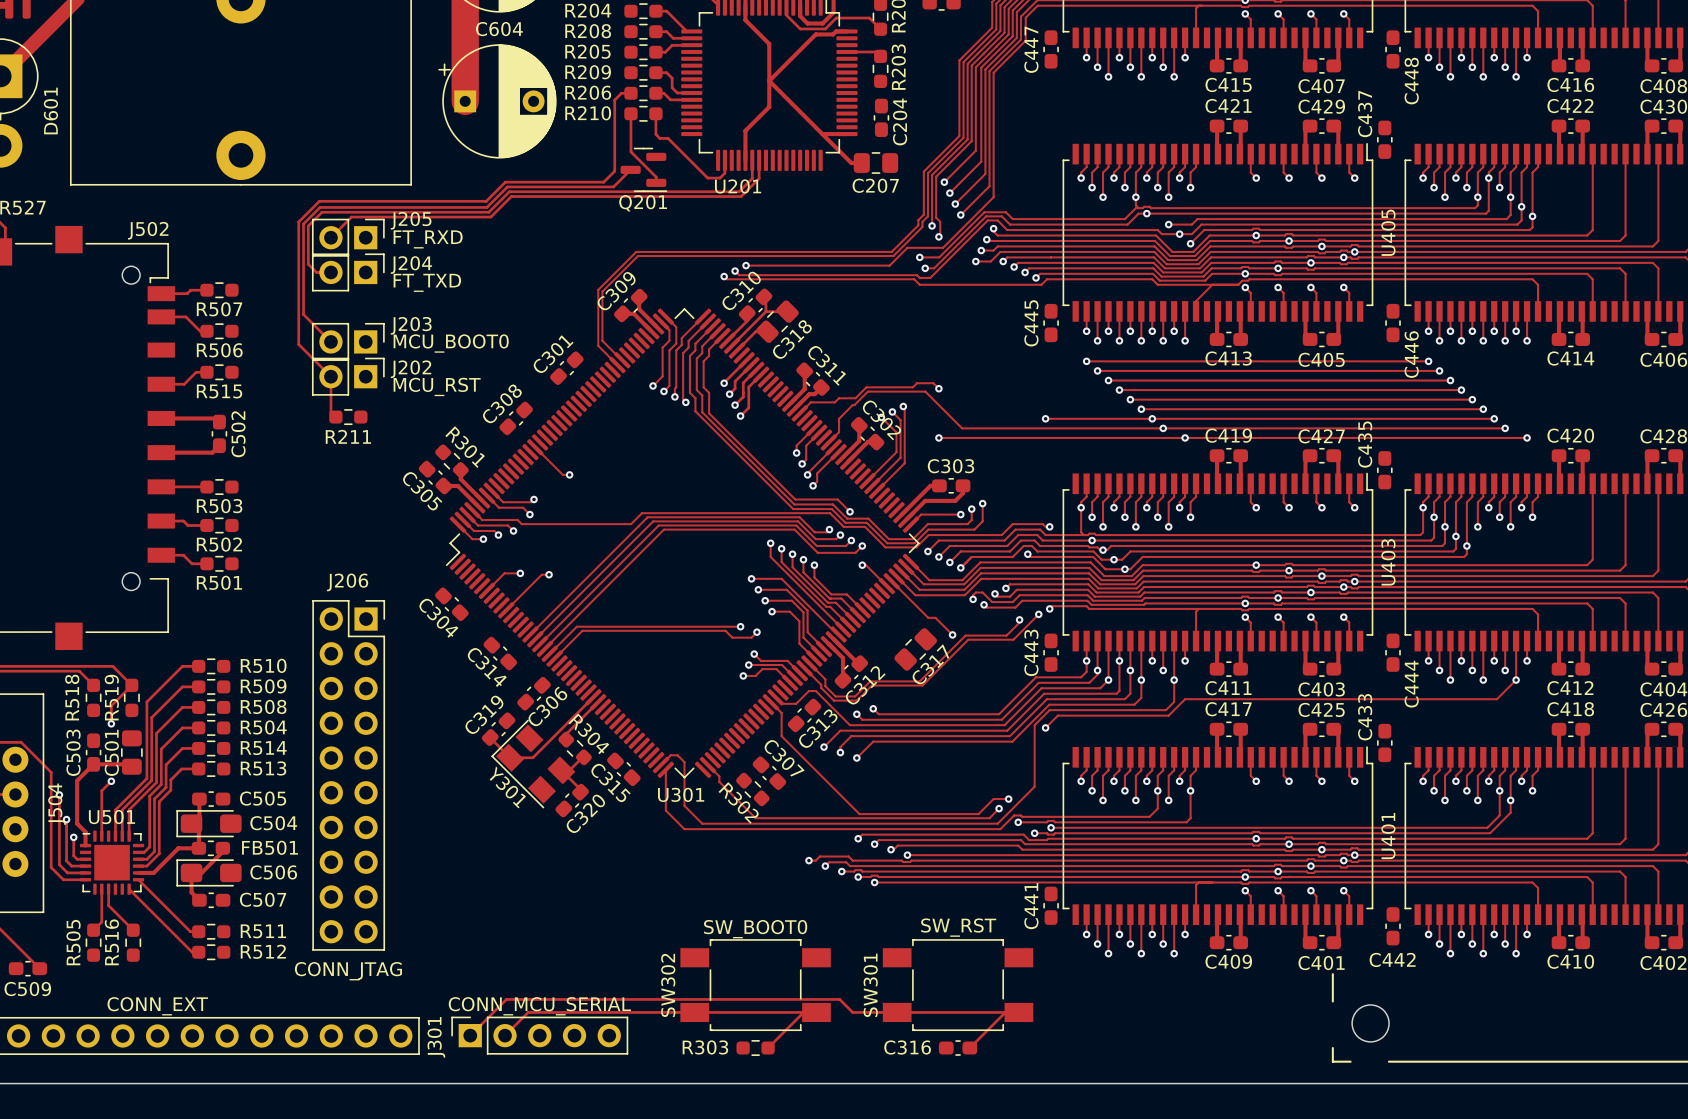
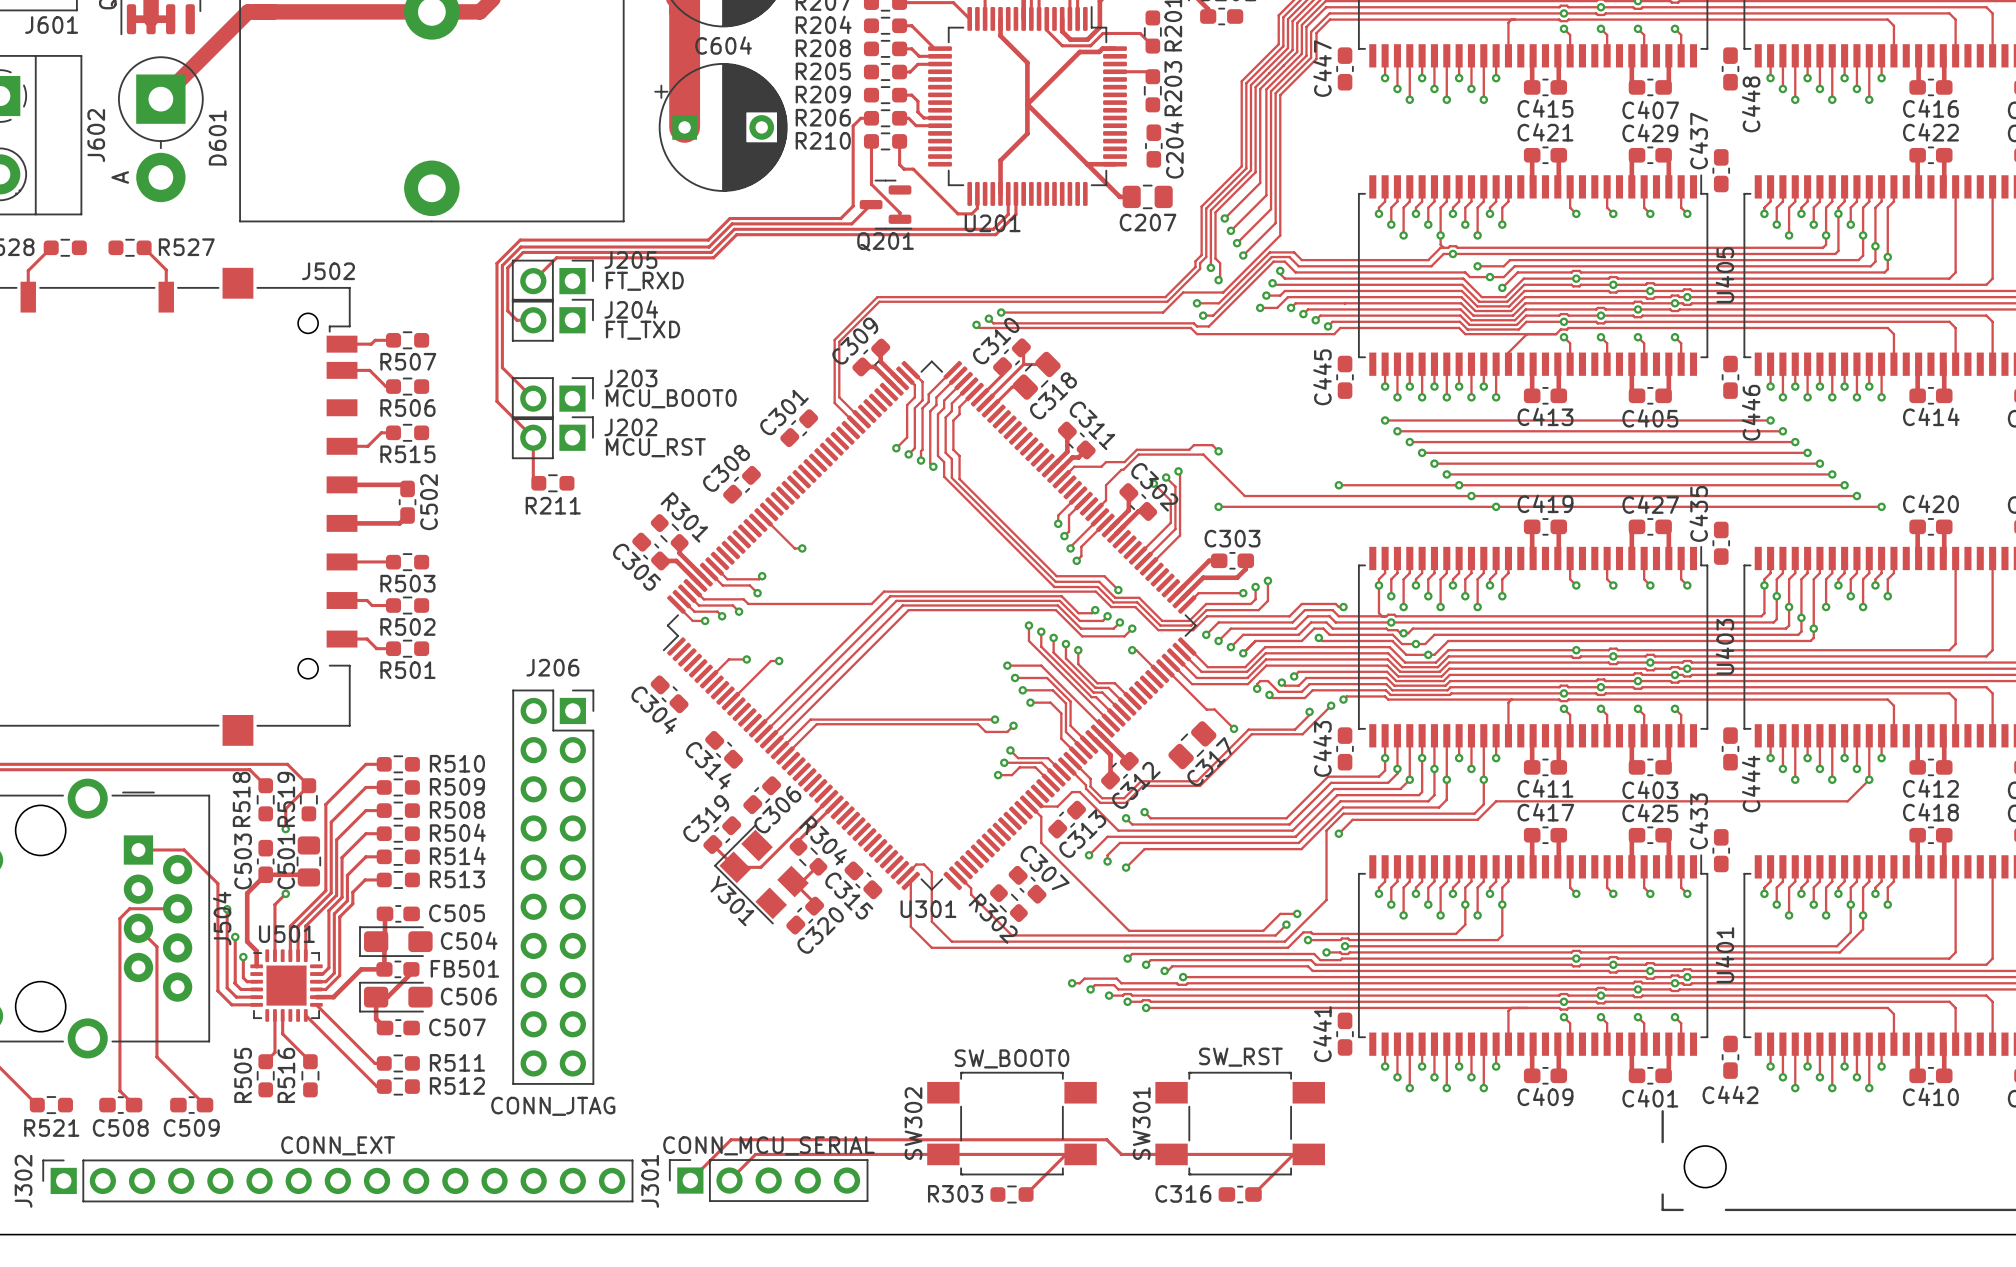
track: (746, 360) (724, 383) -> none
track: (751, 365) (735, 381) (735, 388) (729, 394) -> none
track: (756, 369) (743, 382) (743, 396) (735, 405) -> none
track: (761, 374) (748, 387) (748, 407) (740, 416) -> none
via: (724, 383) -> none
via: (729, 394) -> none
via: (735, 405) -> none
via: (740, 416) -> none

